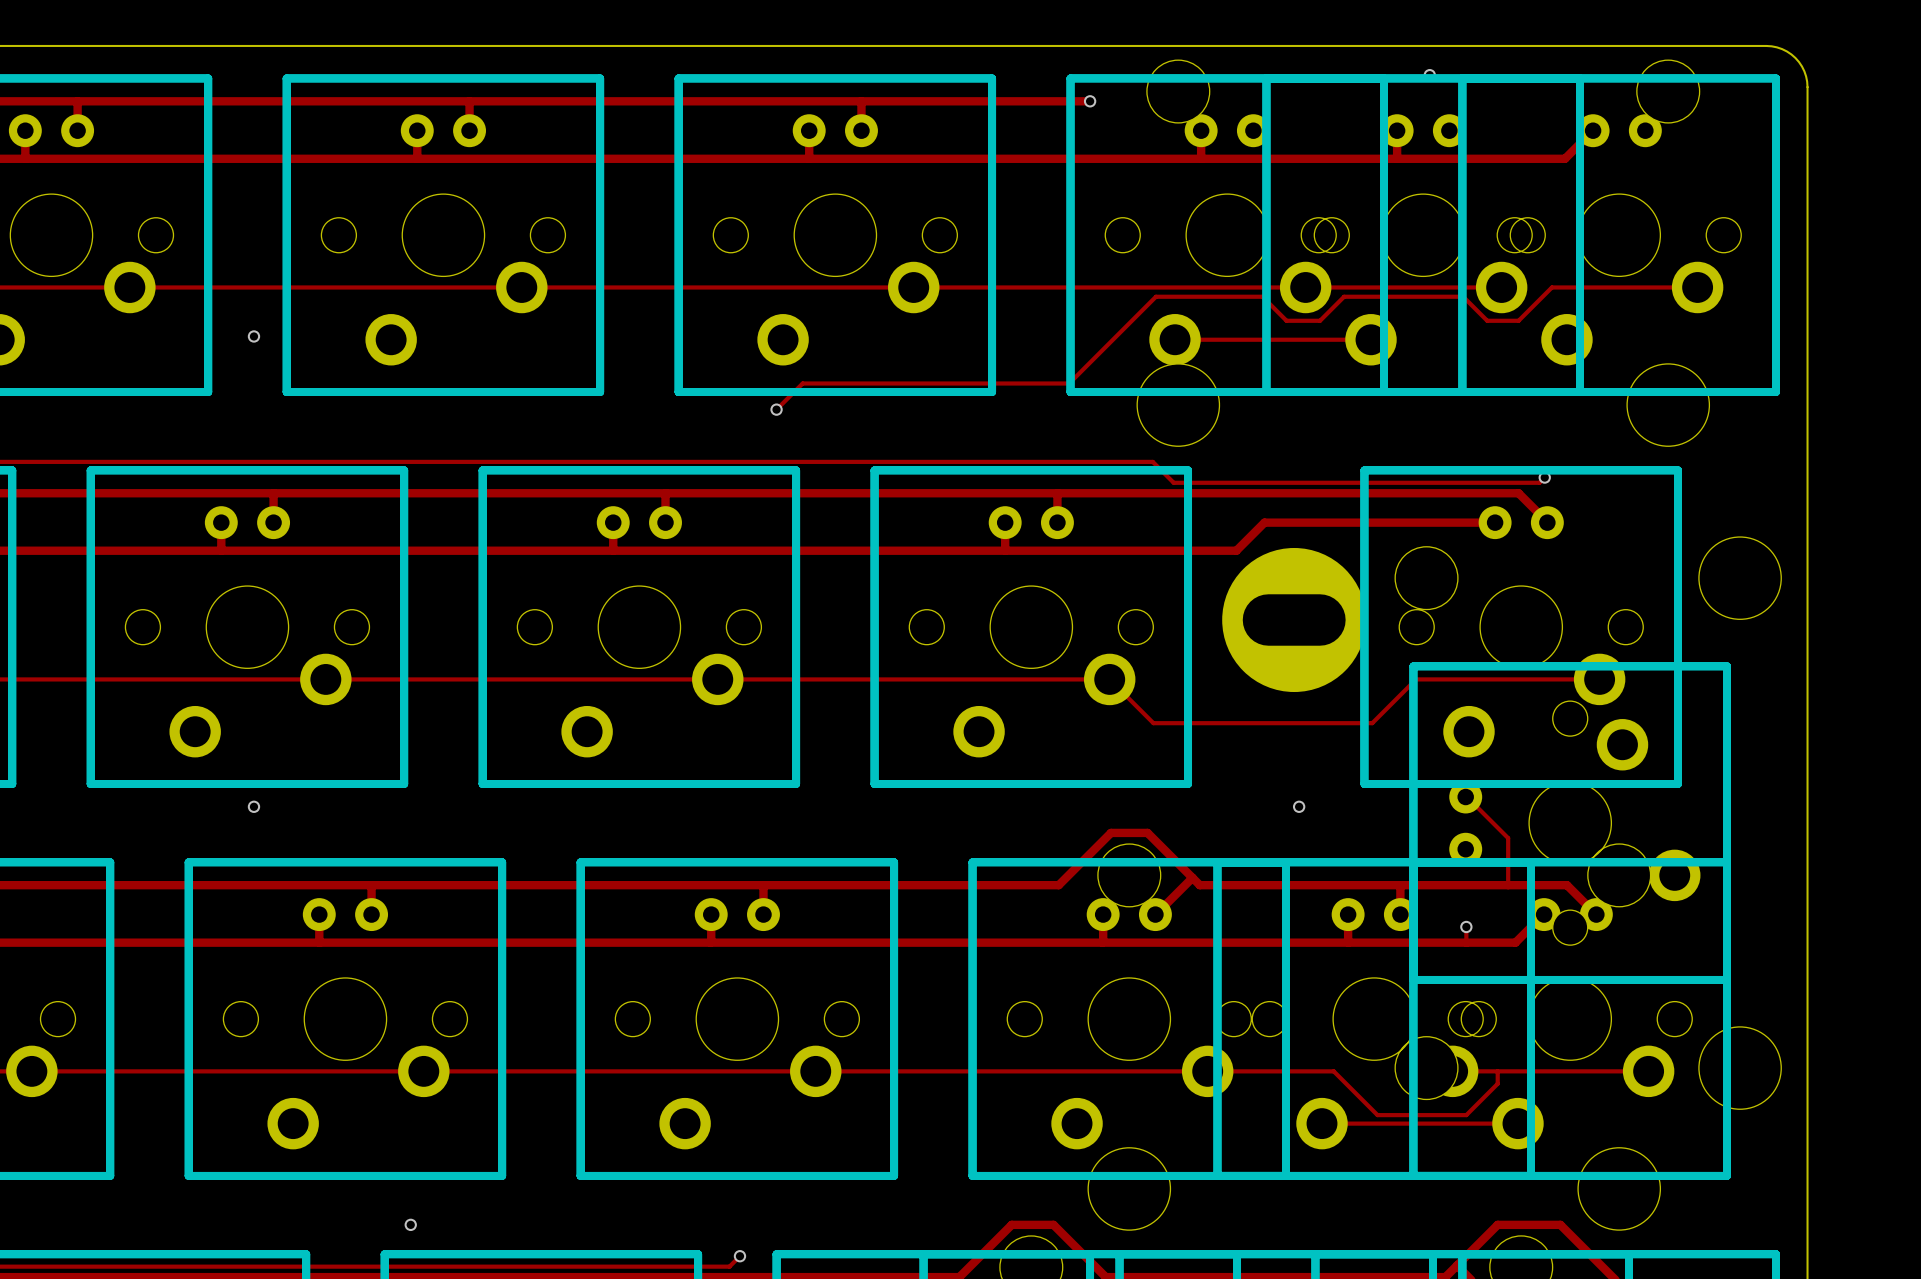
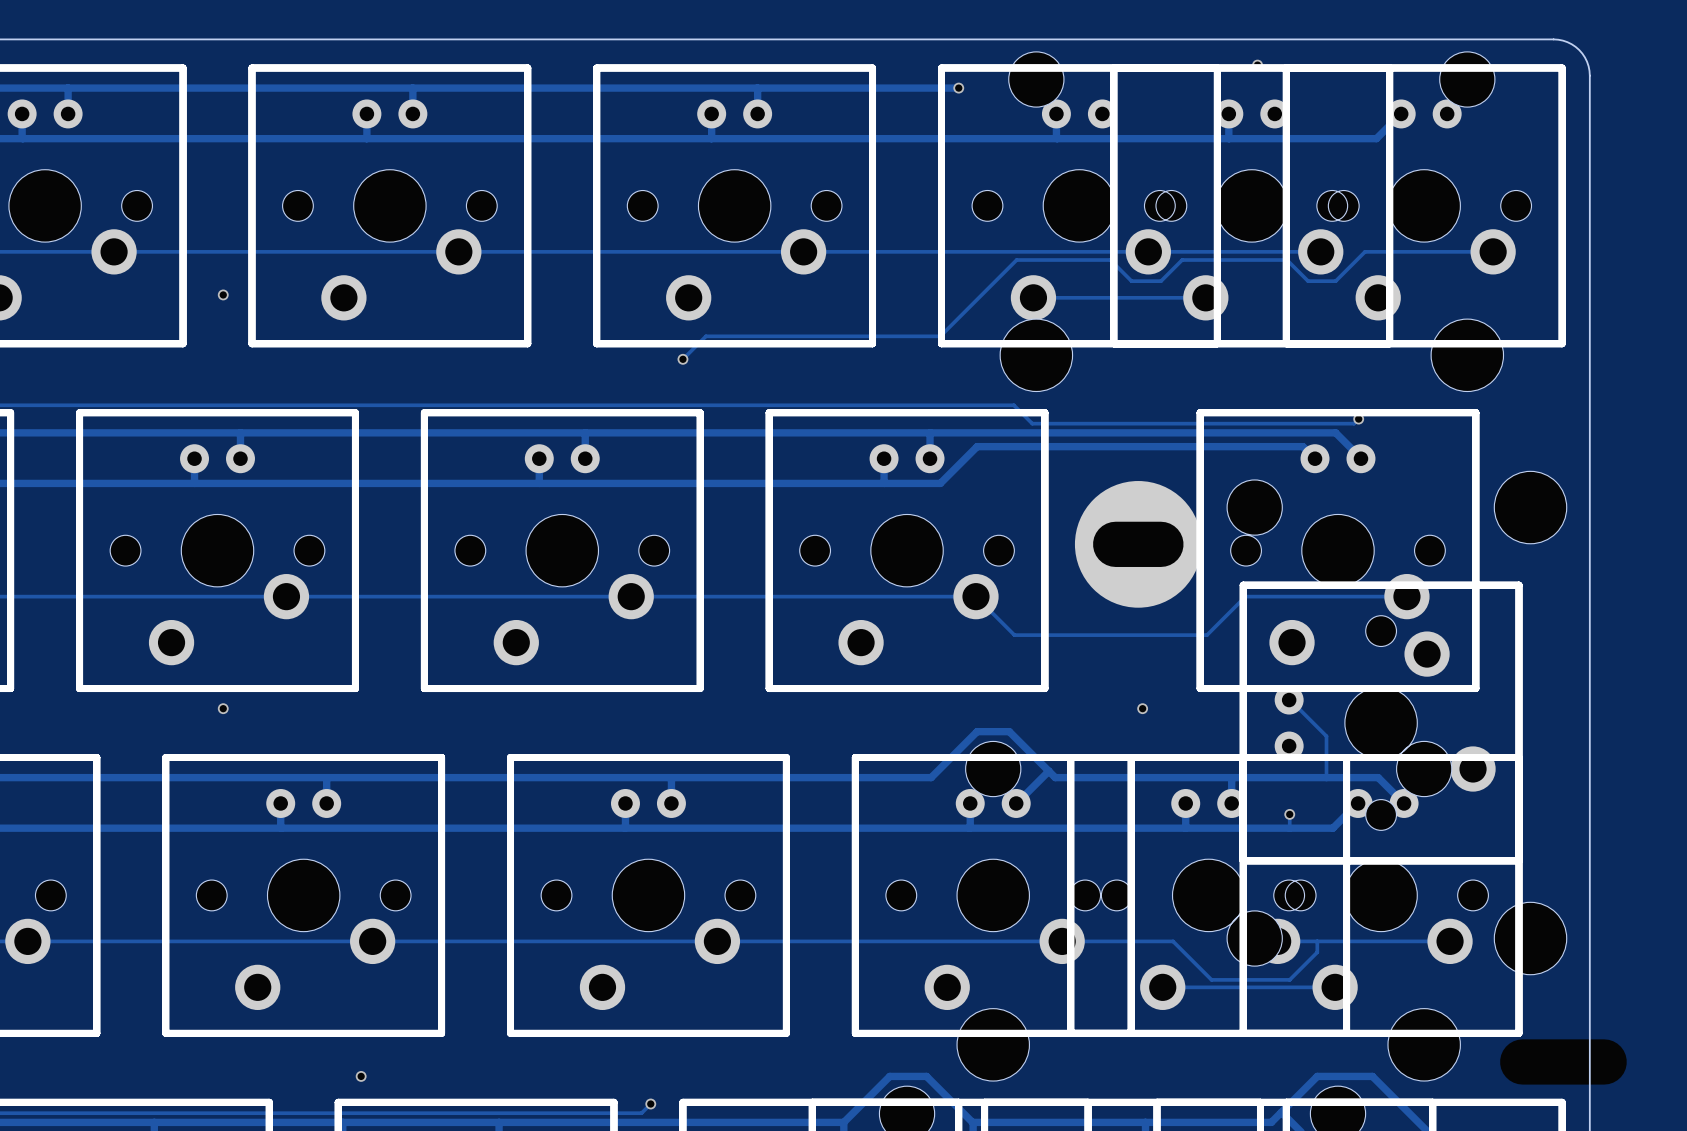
track: (1495, 522) (1264, 522) (1236, 550) (1069, 550) -> (1315, 458) (1302, 446) (977, 446) (940, 483)

